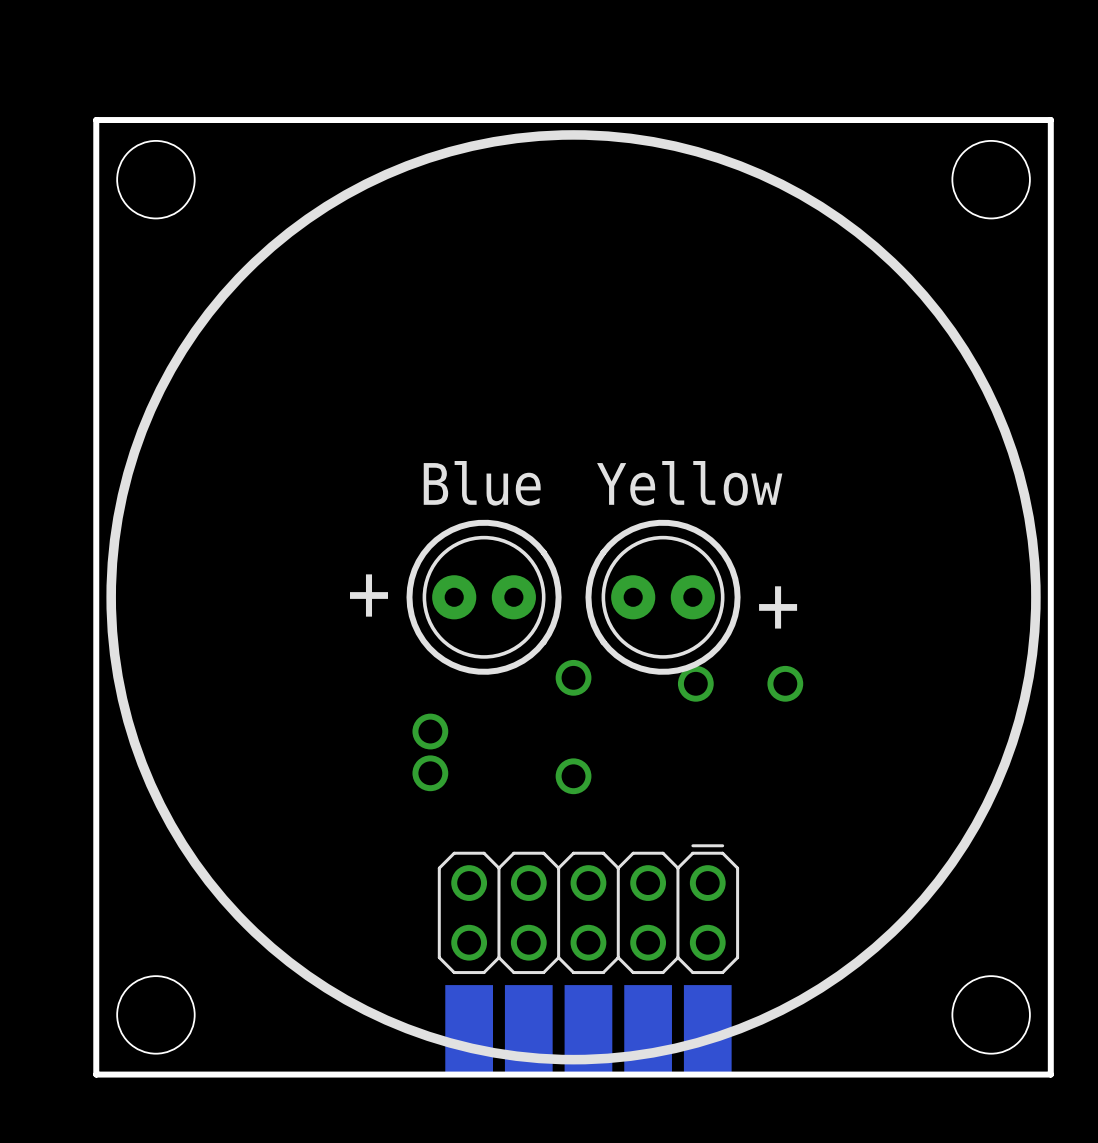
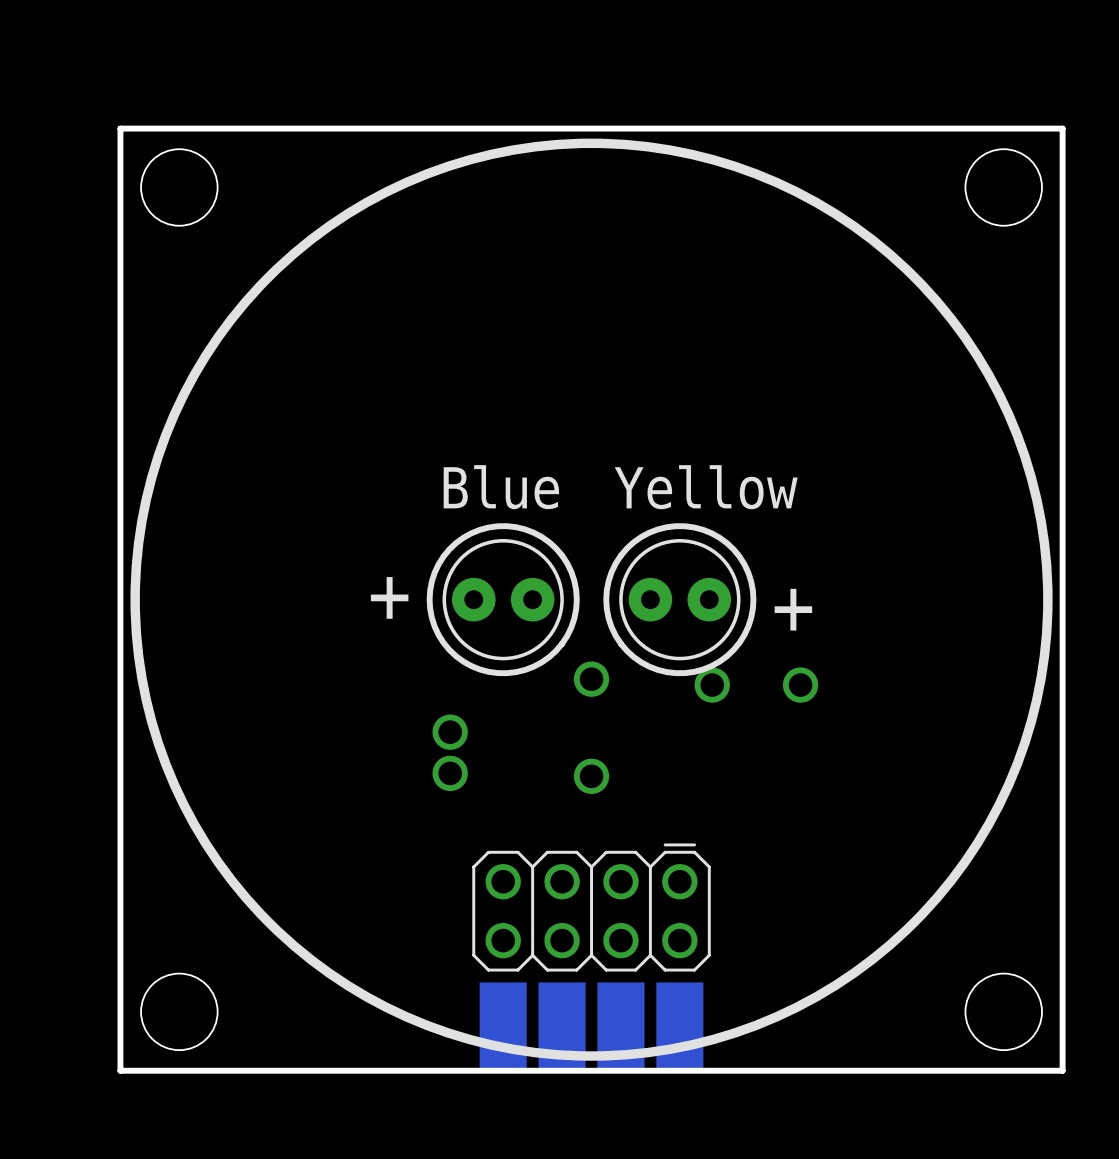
part footprint: [437, 844, 740, 975] -> [472, 843, 711, 972]
part footprint: [445, 985, 732, 1075] -> [479, 982, 704, 1071]

